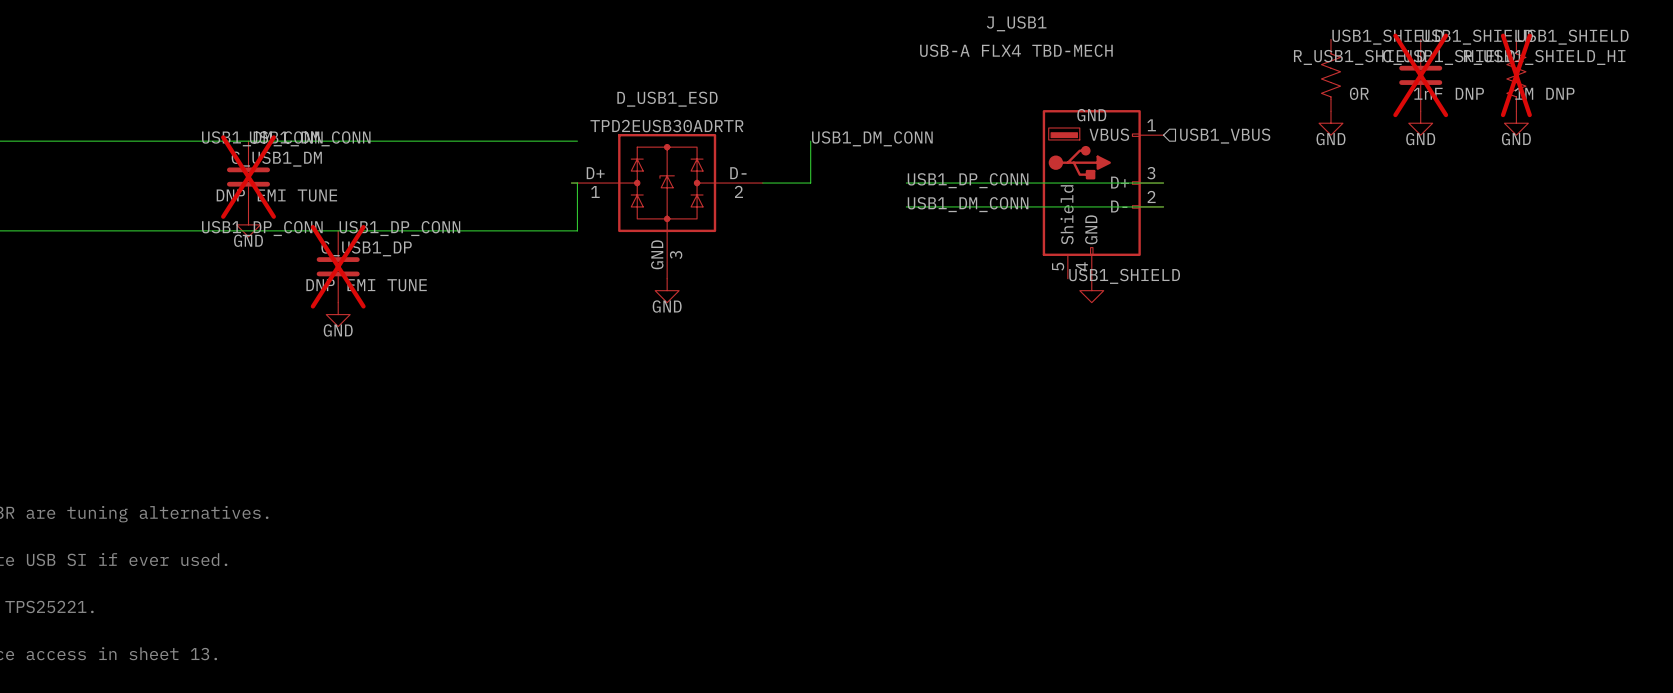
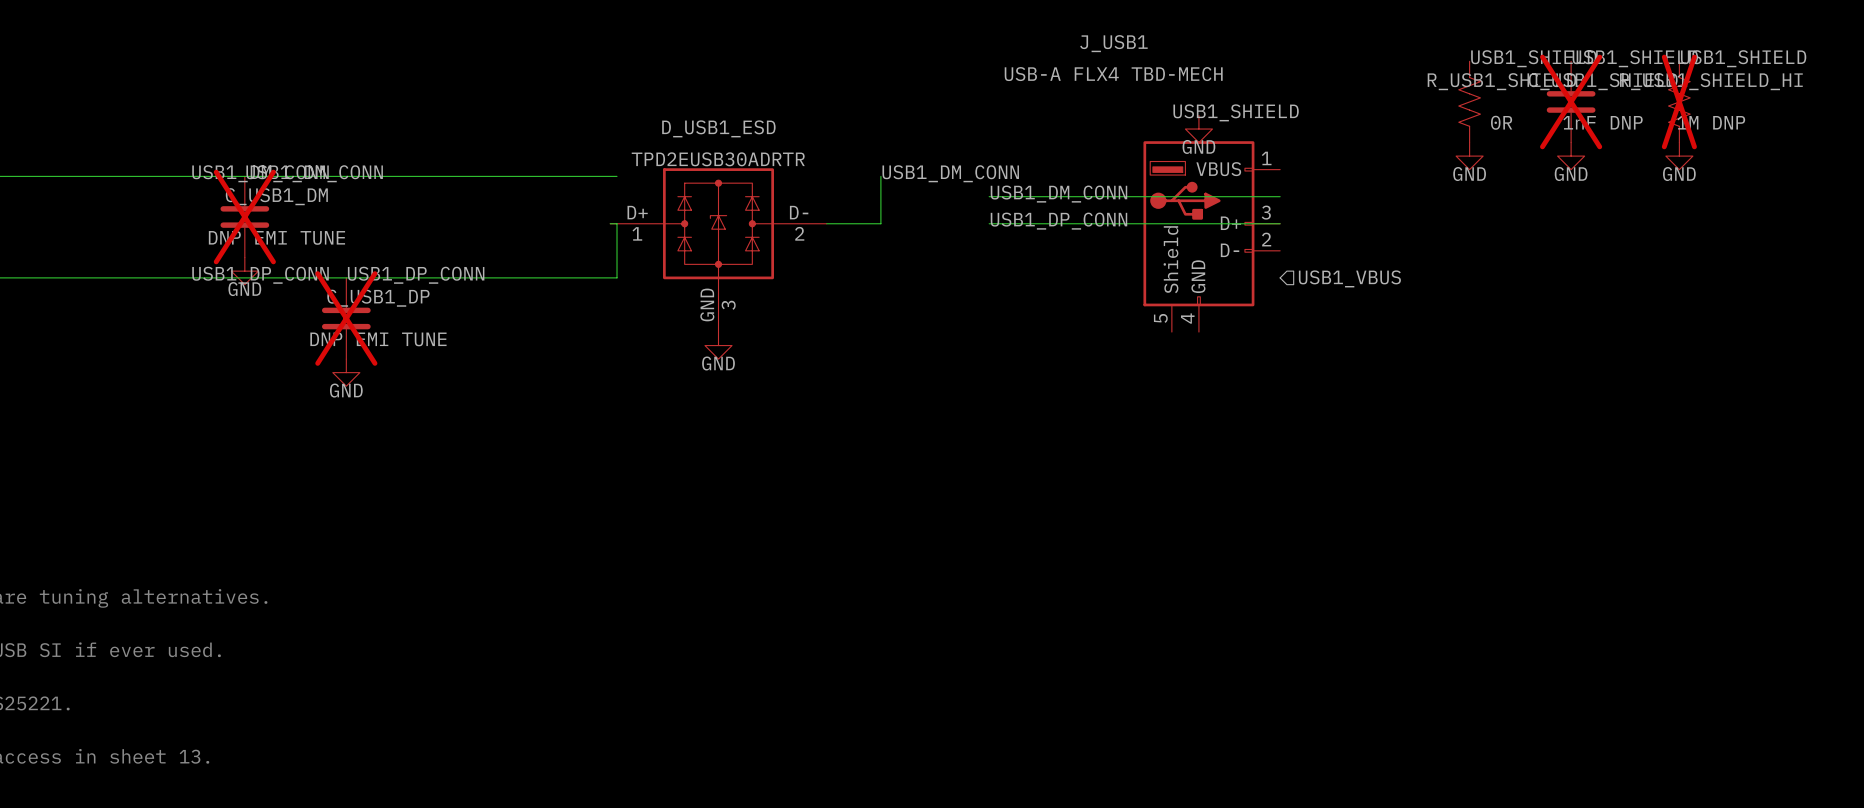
hierarchical label position: USB1_VBUS (1225, 136) -> USB1_VBUS (1349, 278)
label position: USB1_DM_CONN (968, 204) -> USB1_DM_CONN (1058, 194)
wire: (906, 206) (1163, 206) -> (989, 196) (1280, 196)
label position: USB1_SHIELD (1124, 276) -> USB1_SHIELD (1236, 112)
power symbol position: GND (1091, 290) -> GND (1198, 129)

